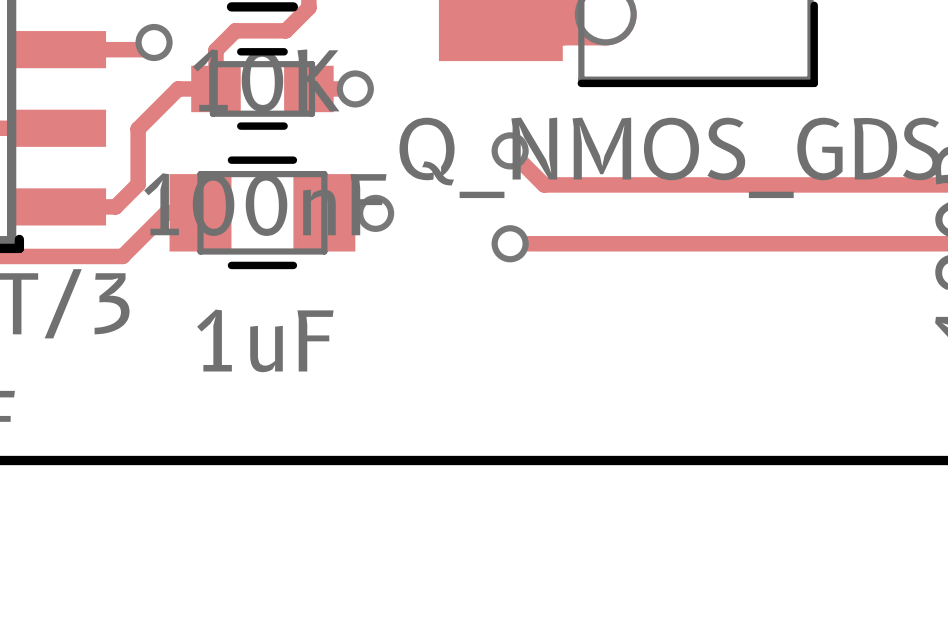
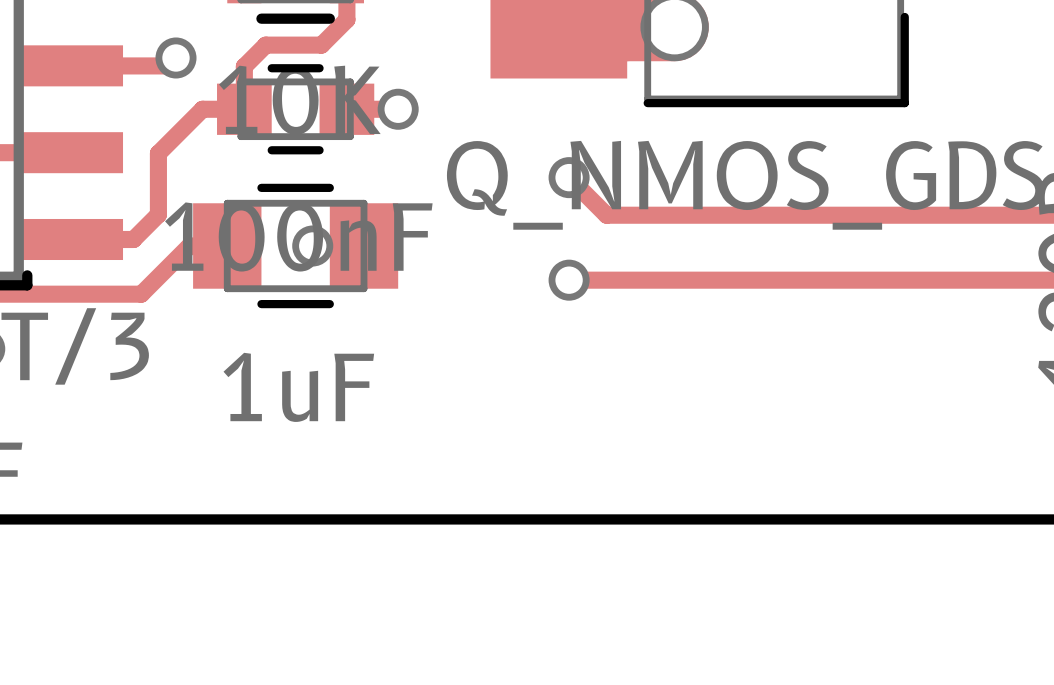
via position: (375, 213) -> (312, 245)

